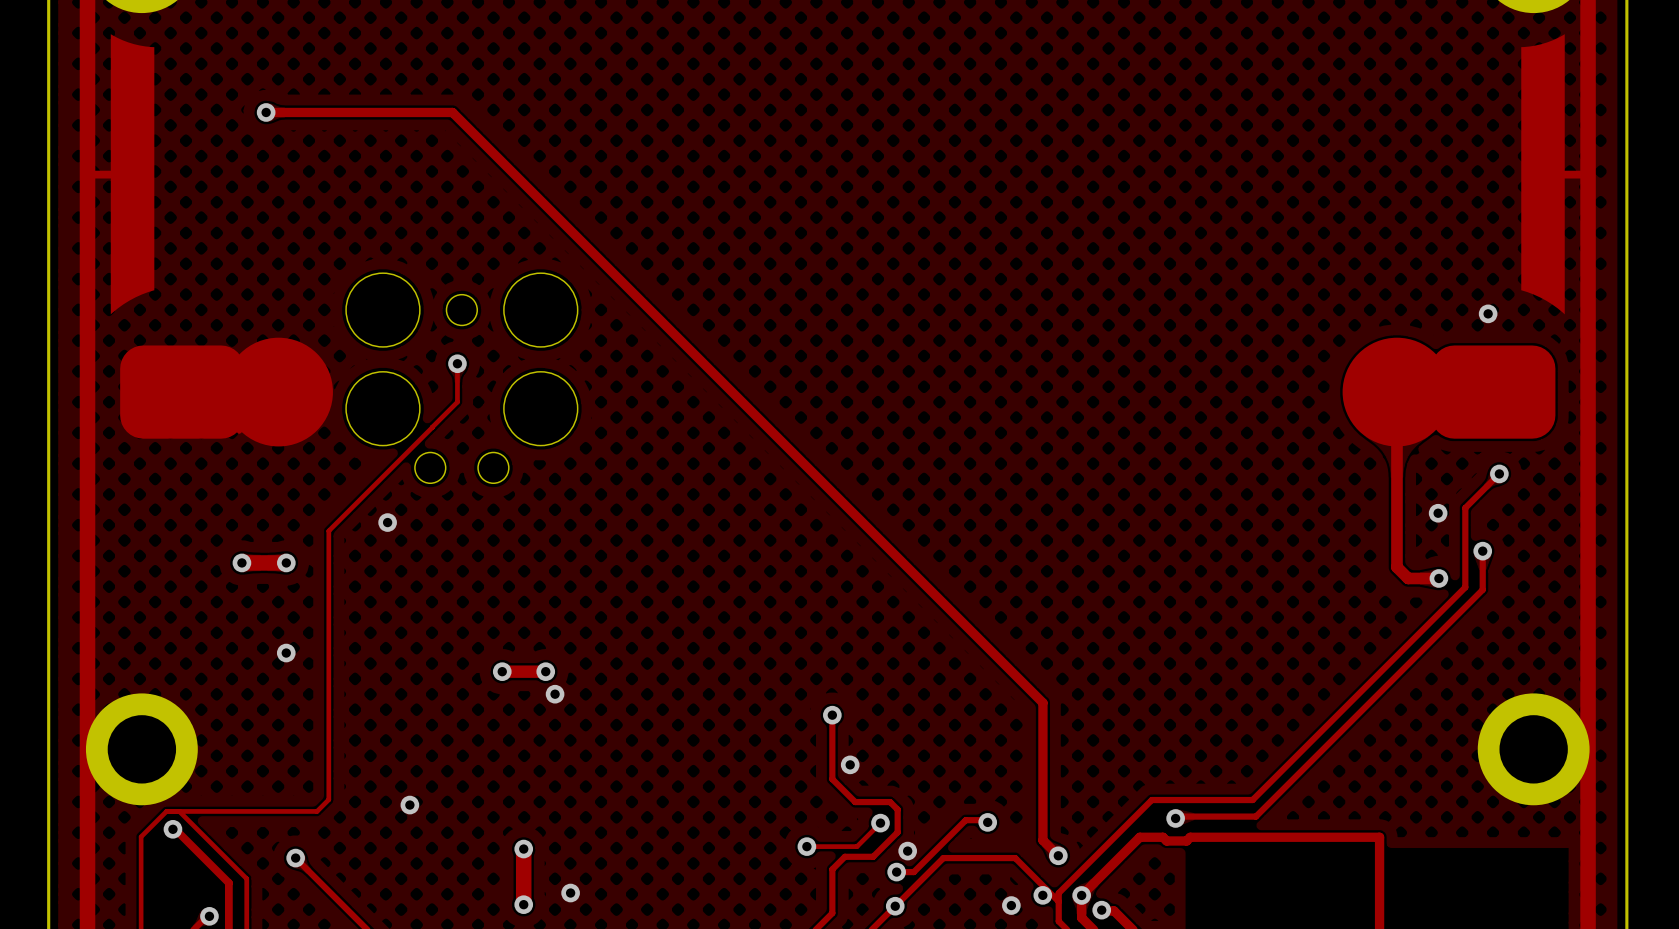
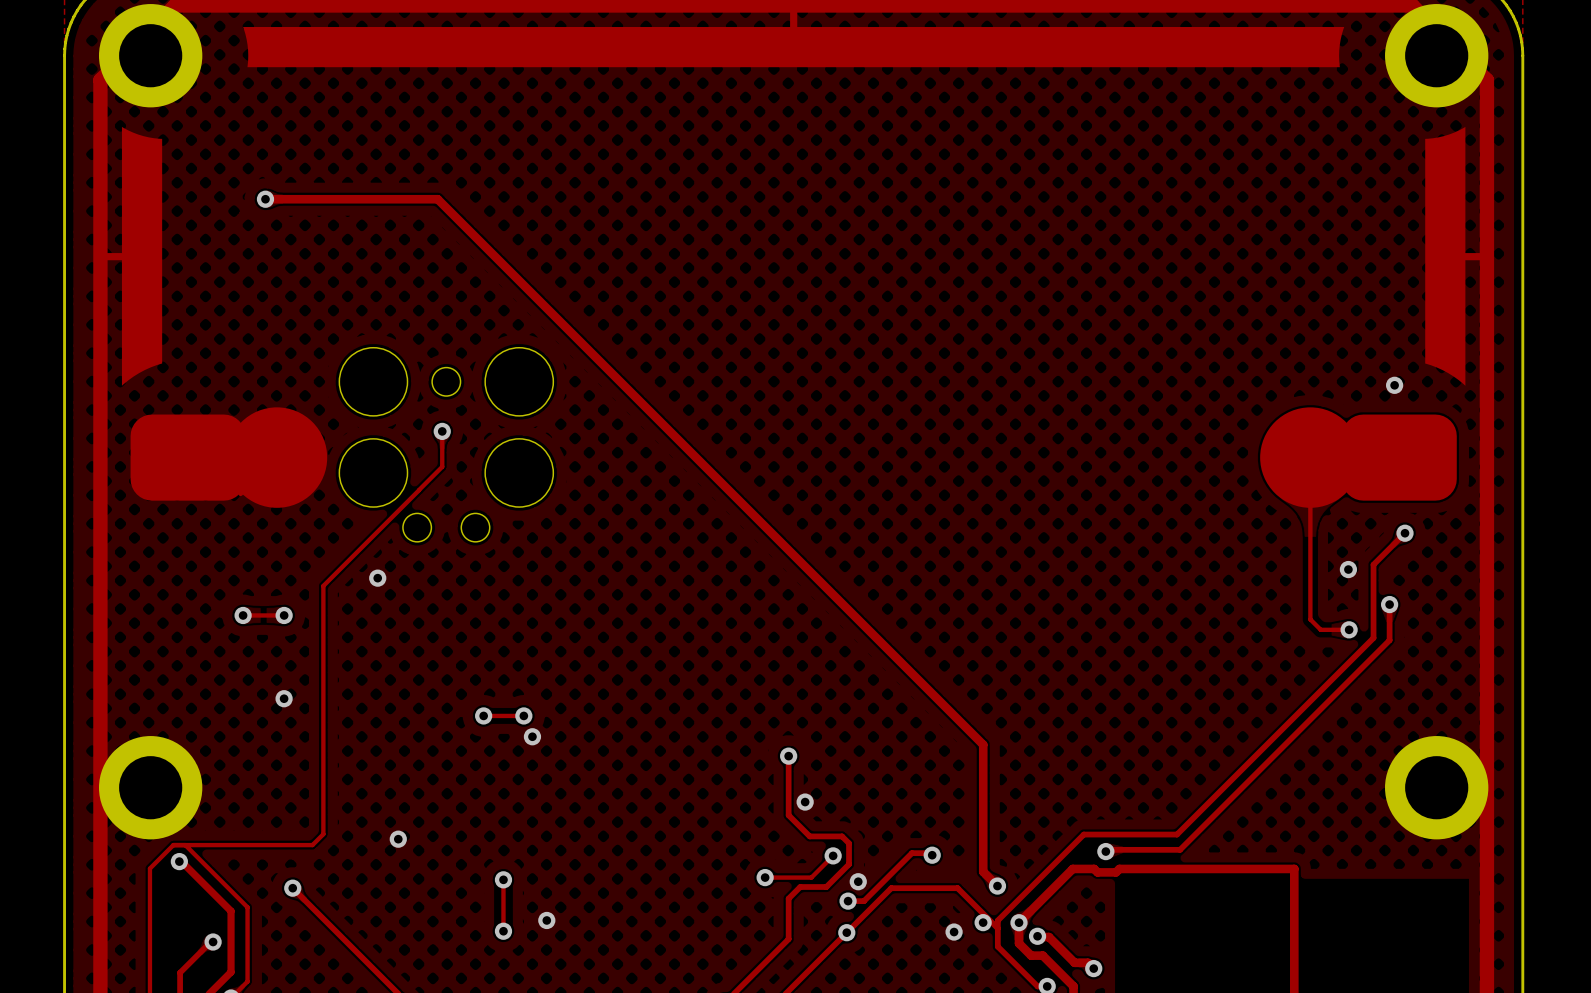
track width: thick (1493, 392) (1396, 392) (1396, 567) (1408, 578) (1438, 578) -> thin (1399, 457) (1310, 457) (1310, 619) (1320, 629) (1349, 629)
track width: thick (241, 562) (286, 562) -> thin (243, 615) (284, 615)
track width: thick (502, 671) (545, 671) -> thin (483, 715) (523, 715)
track width: thick (523, 849) (523, 904) -> thin (503, 879) (503, 931)

